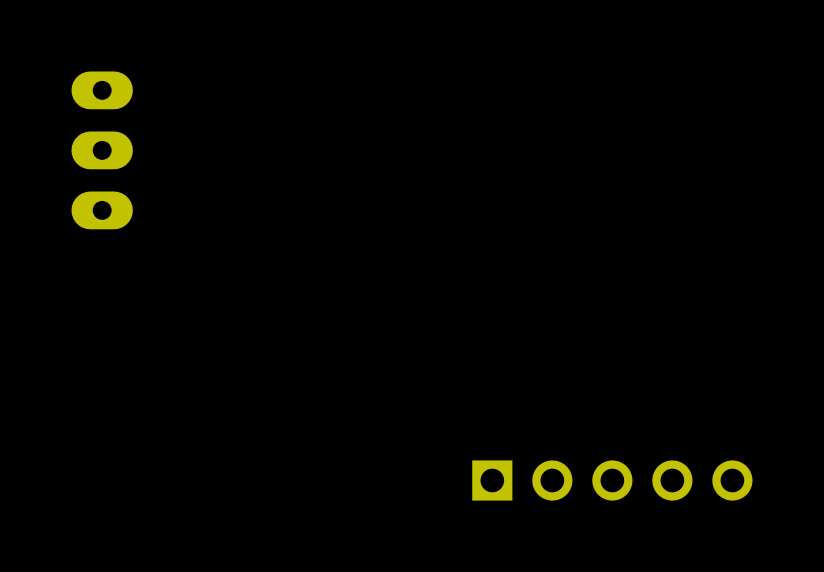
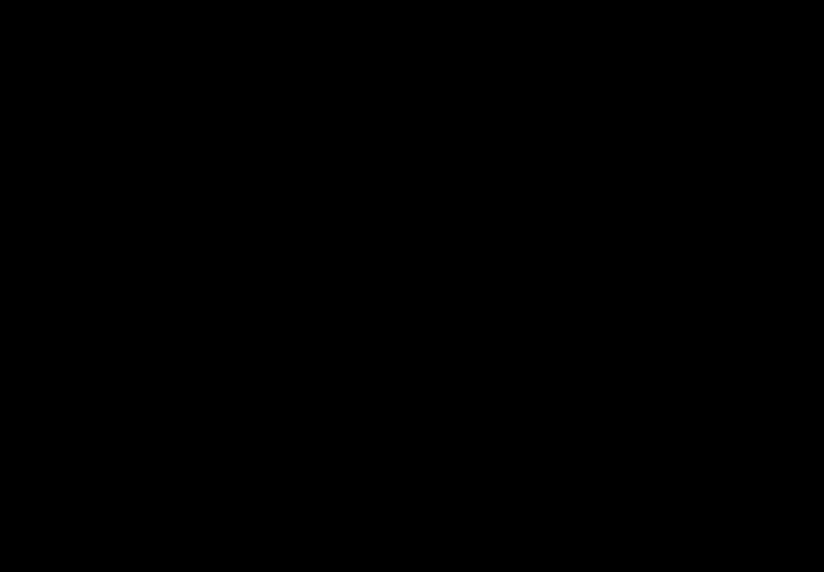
part: (102, 150) -> none
part: (612, 480) -> none

